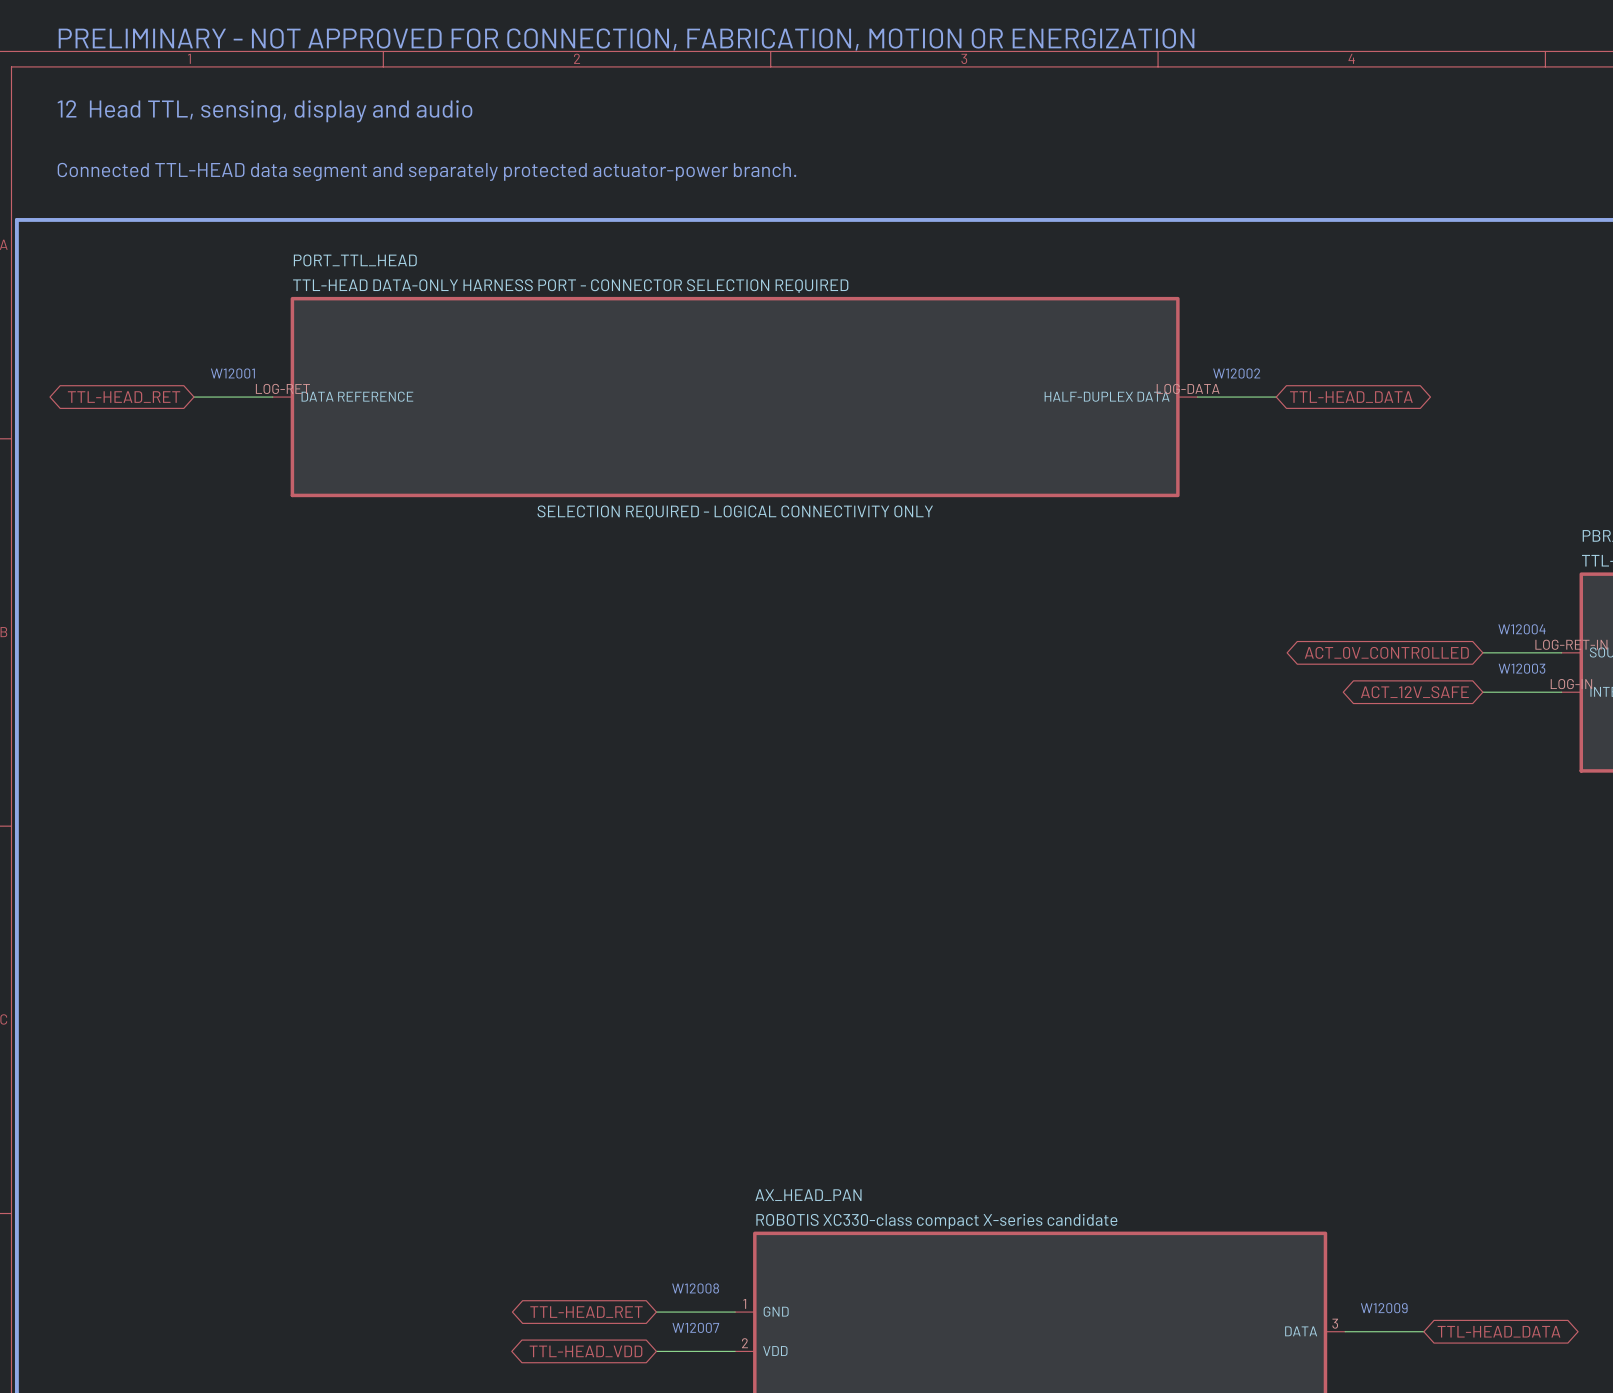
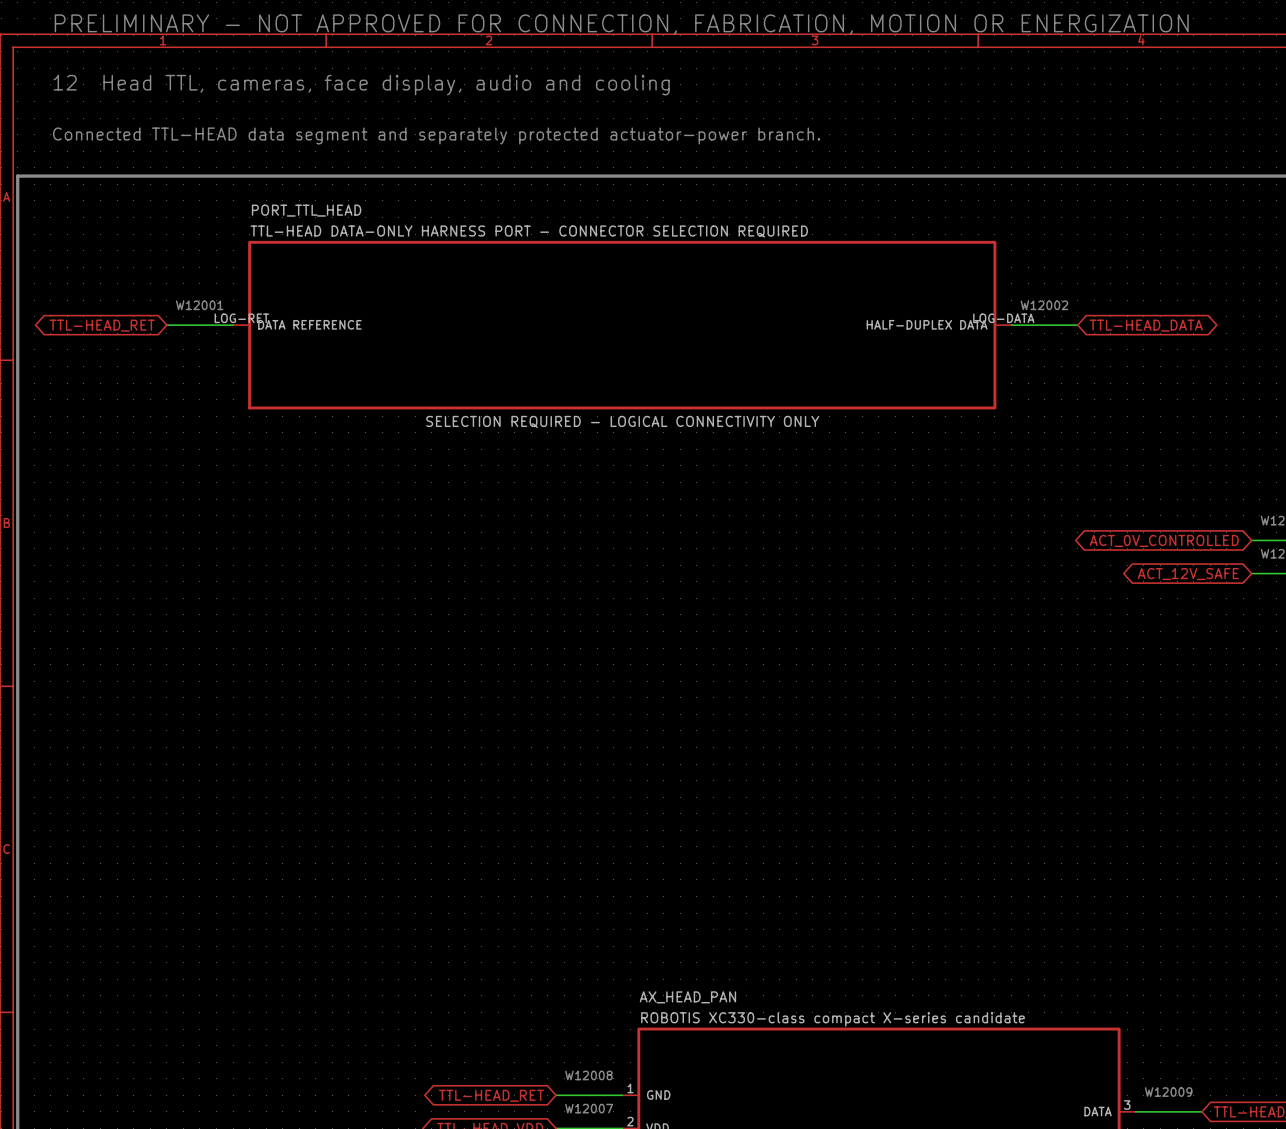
text: 12 Head TTL, sensing, display and audio (265, 111) -> 12 Head TTL, cameras, face display, audio and cooling (361, 85)

